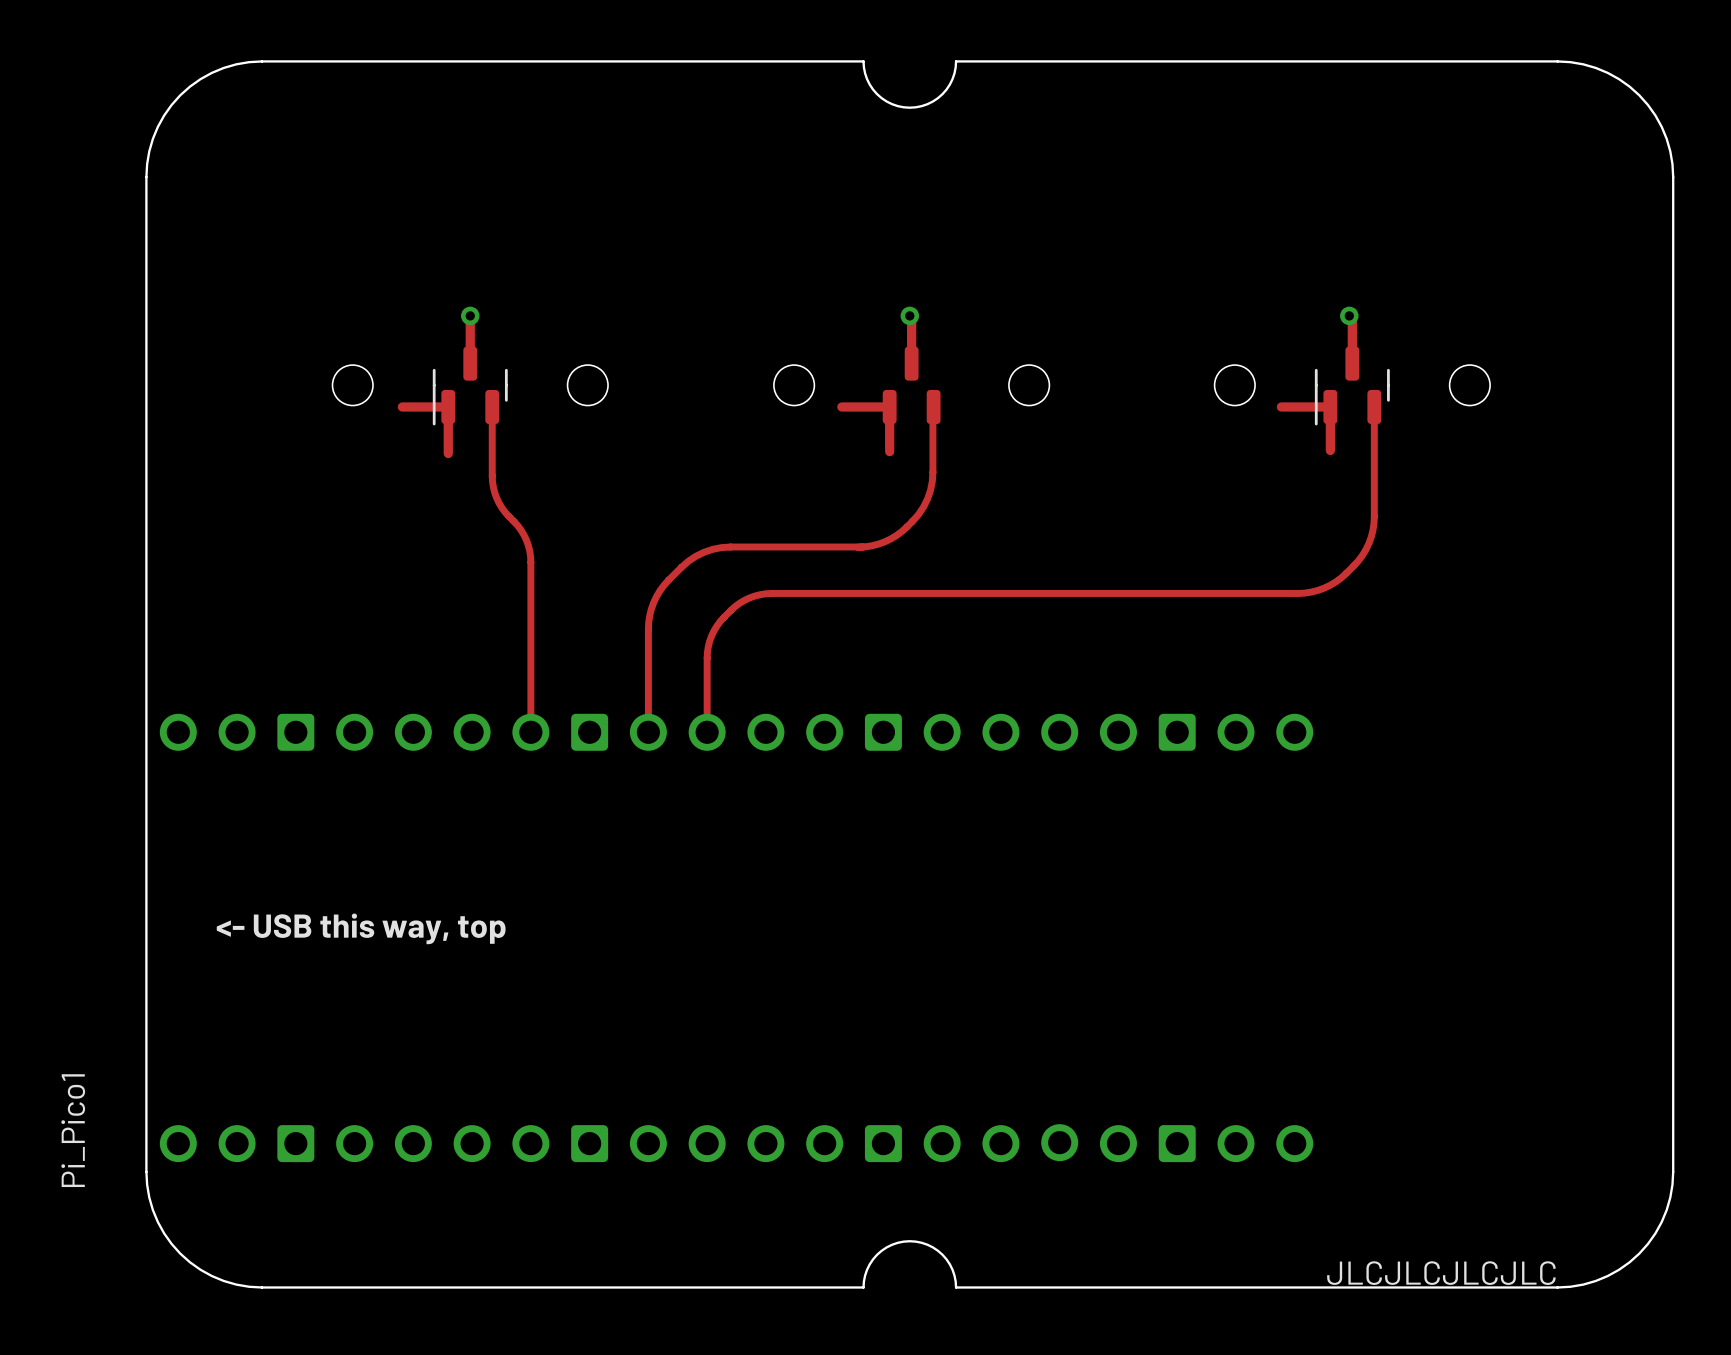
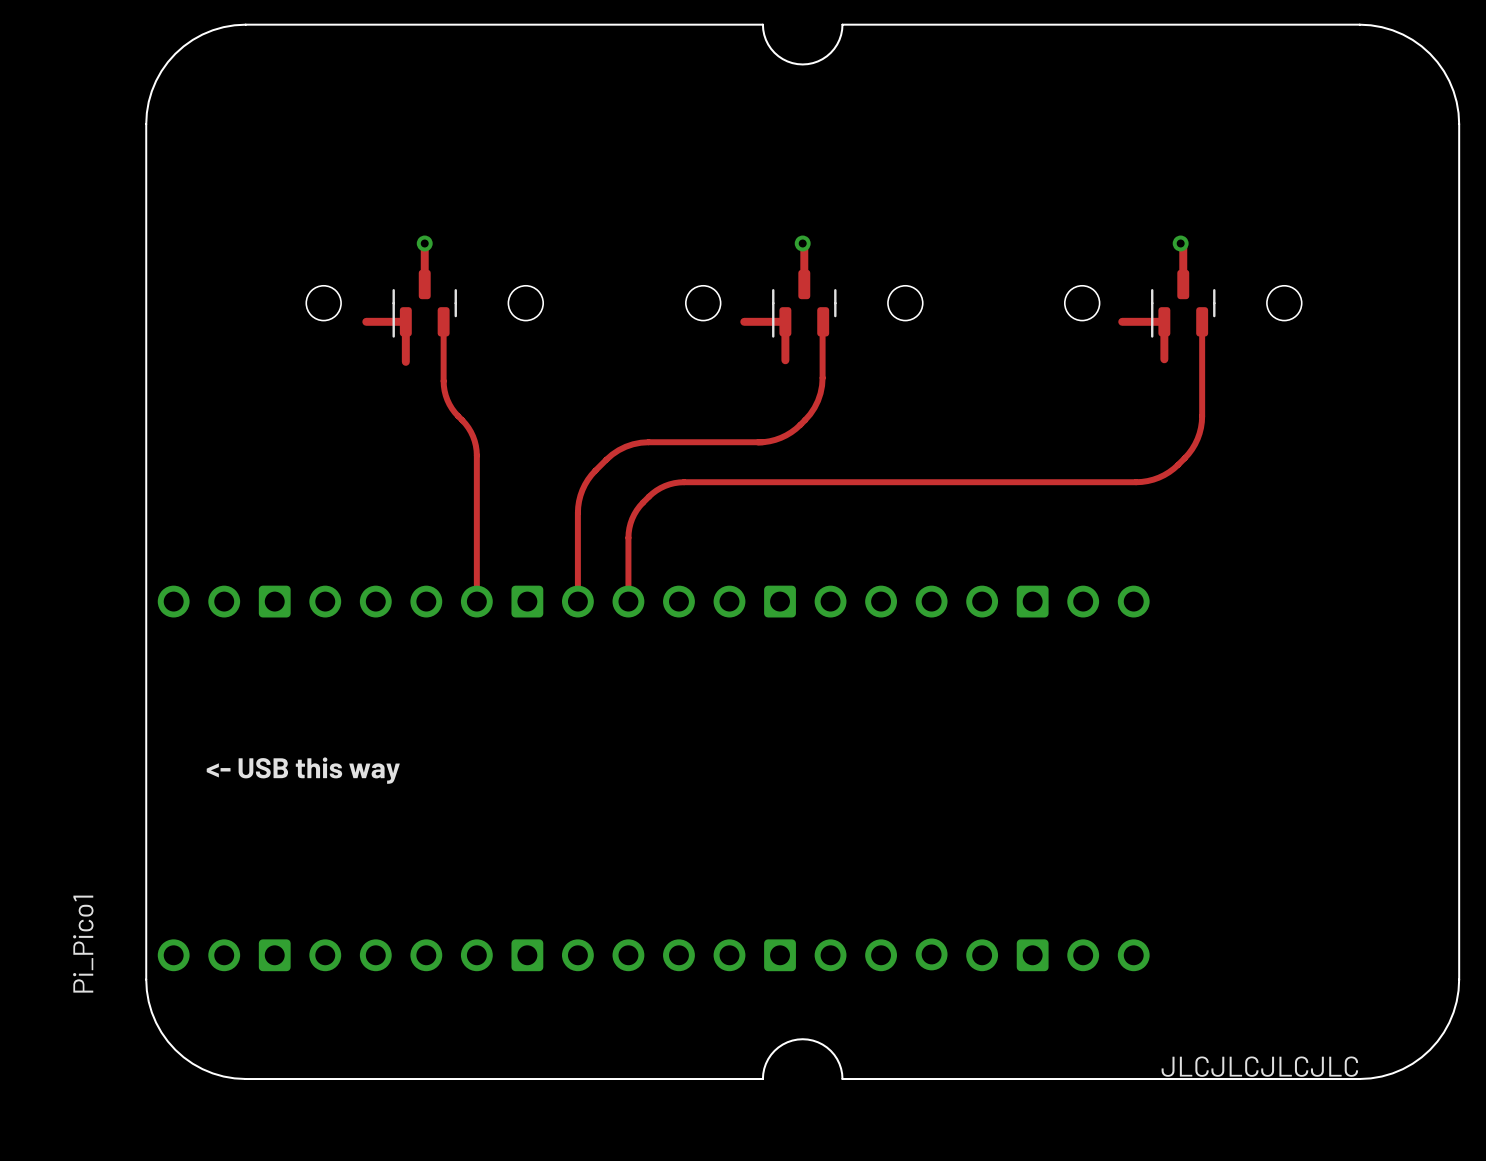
part footprint: [882, 346, 941, 425] -> [772, 269, 837, 338]
text: <- USB this way, top (361, 928) -> <- USB this way (303, 770)

